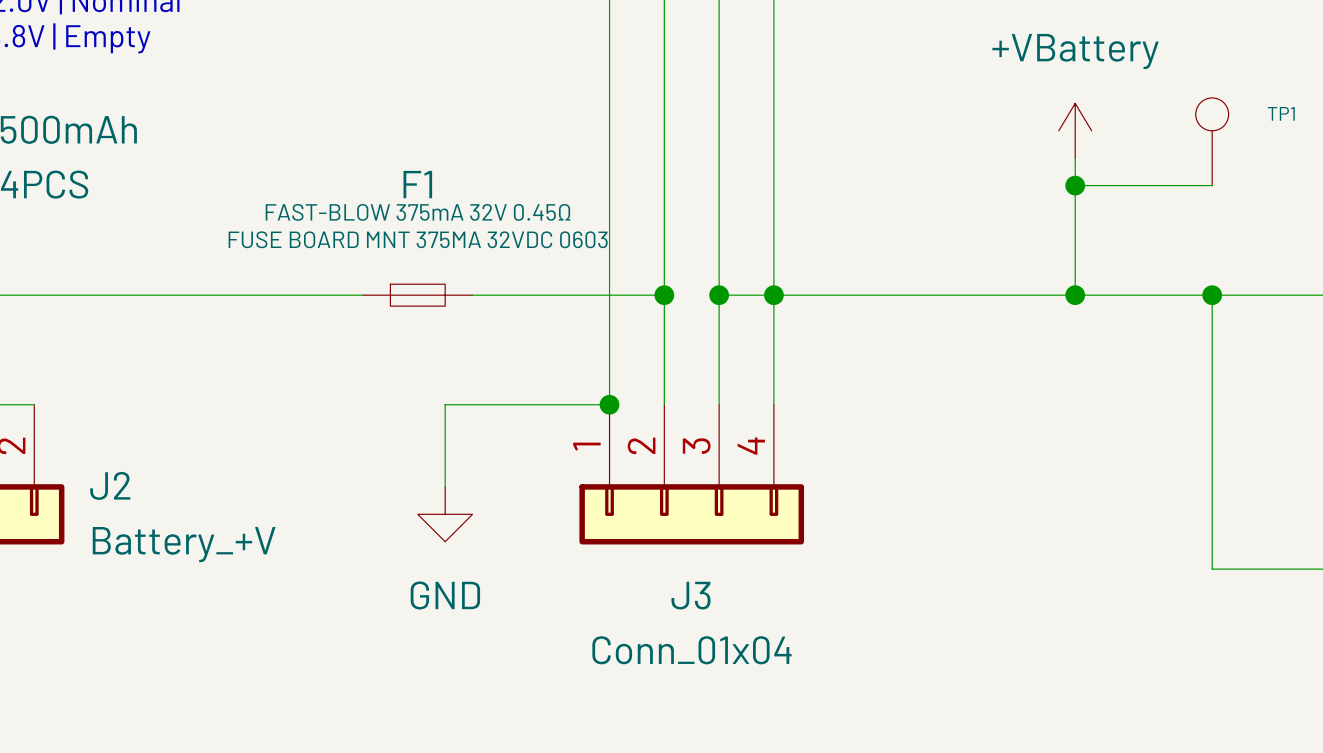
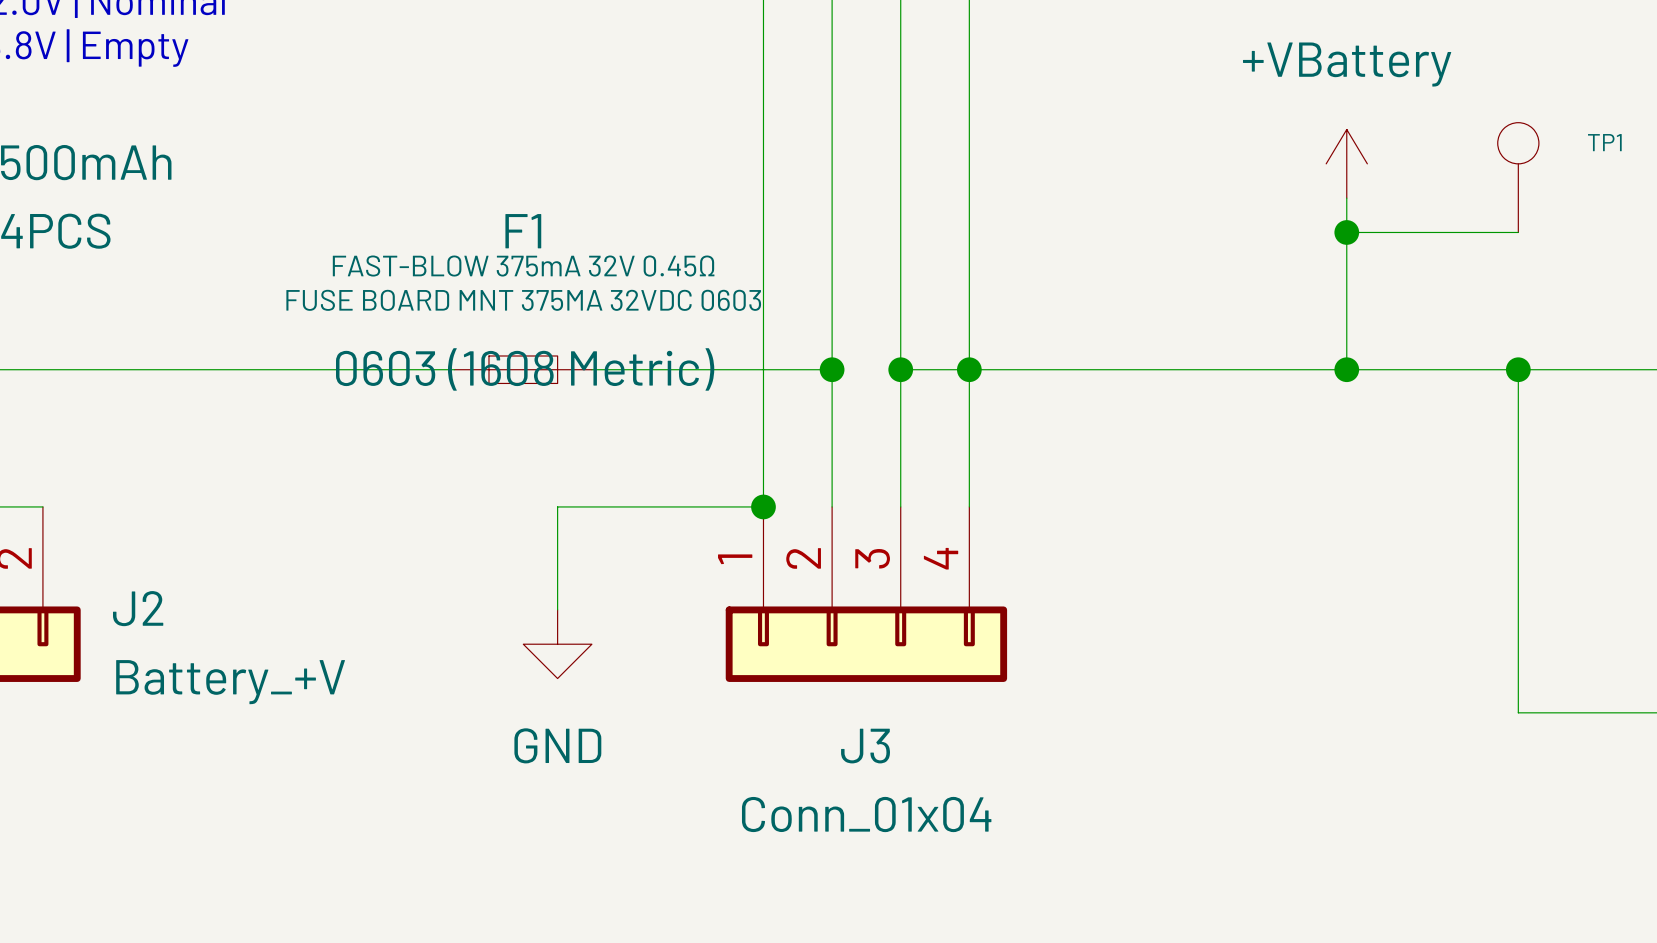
F1 text: none -> 0603 (1608 Metric) (525, 369)

